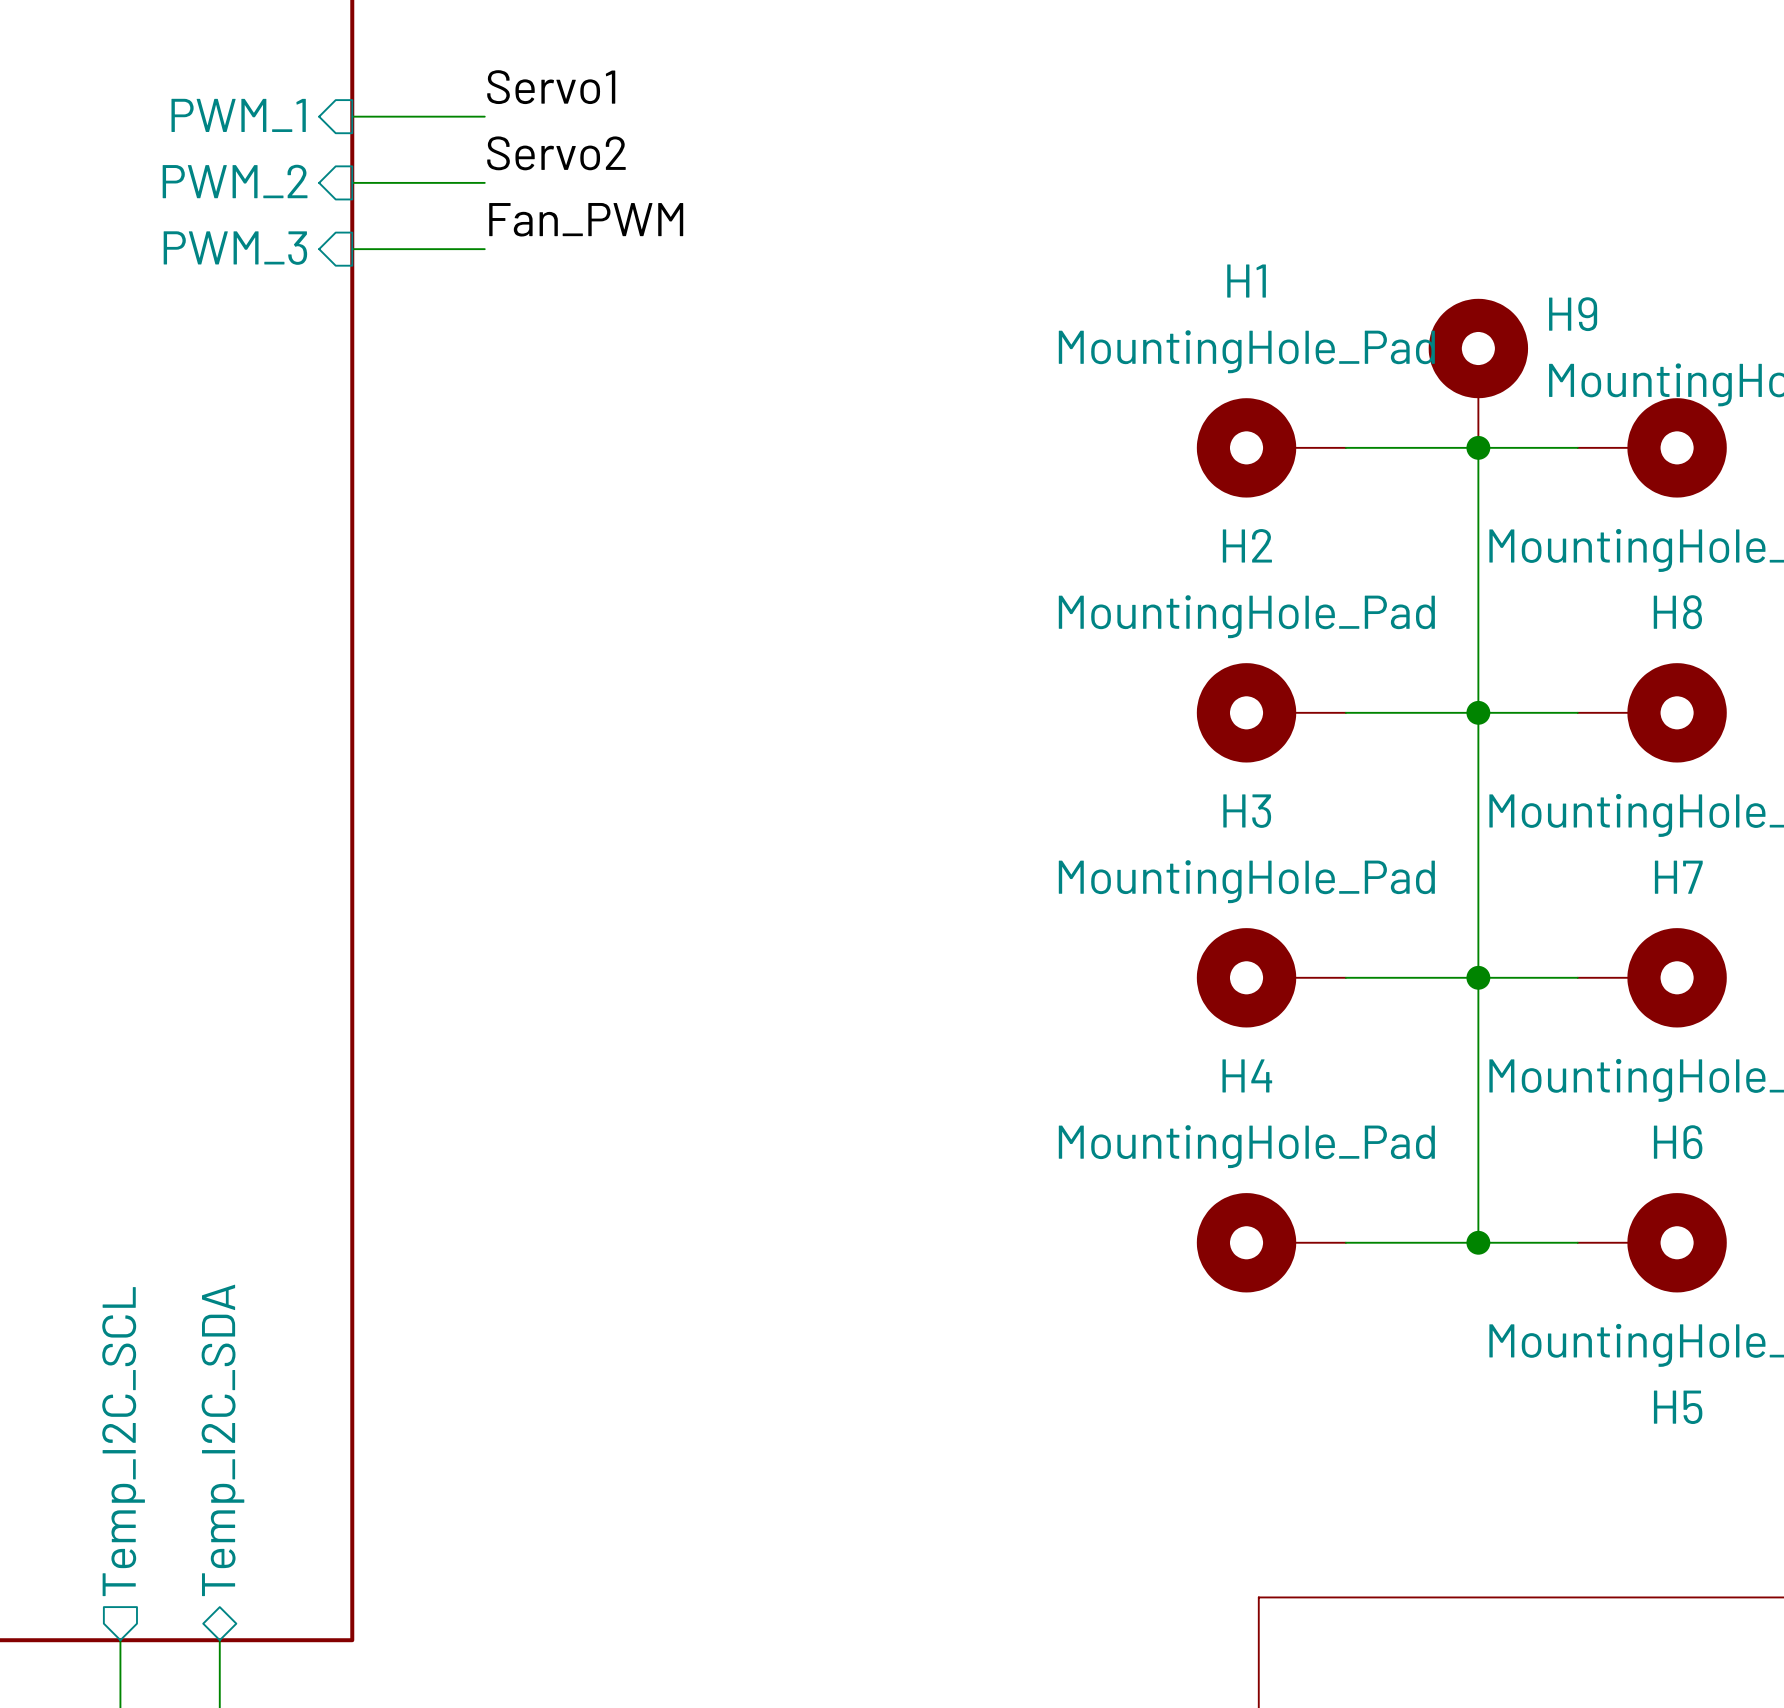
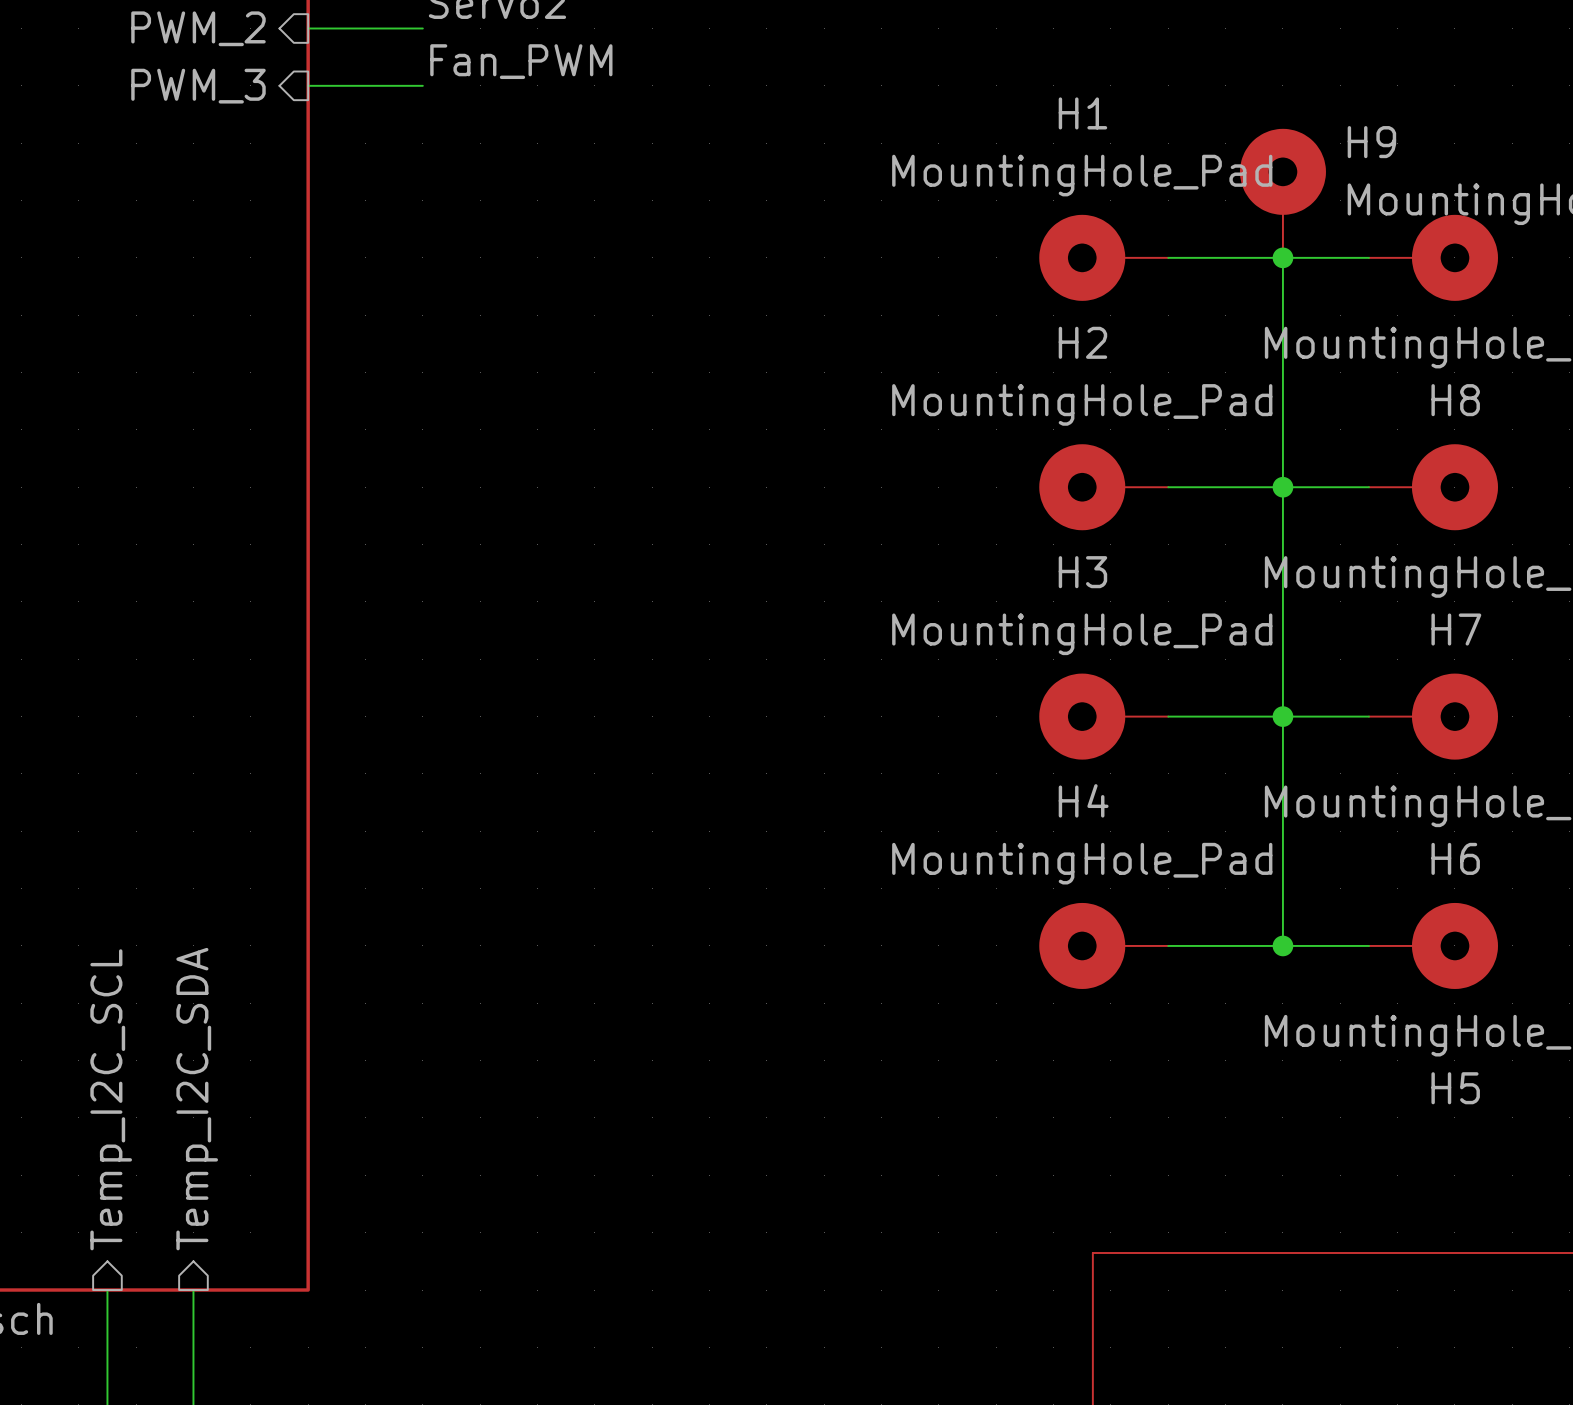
sheet pin shape: bidirectional (222, 1440) -> input (197, 1099)
sheet pin shape: output (123, 1441) -> input (111, 1099)

